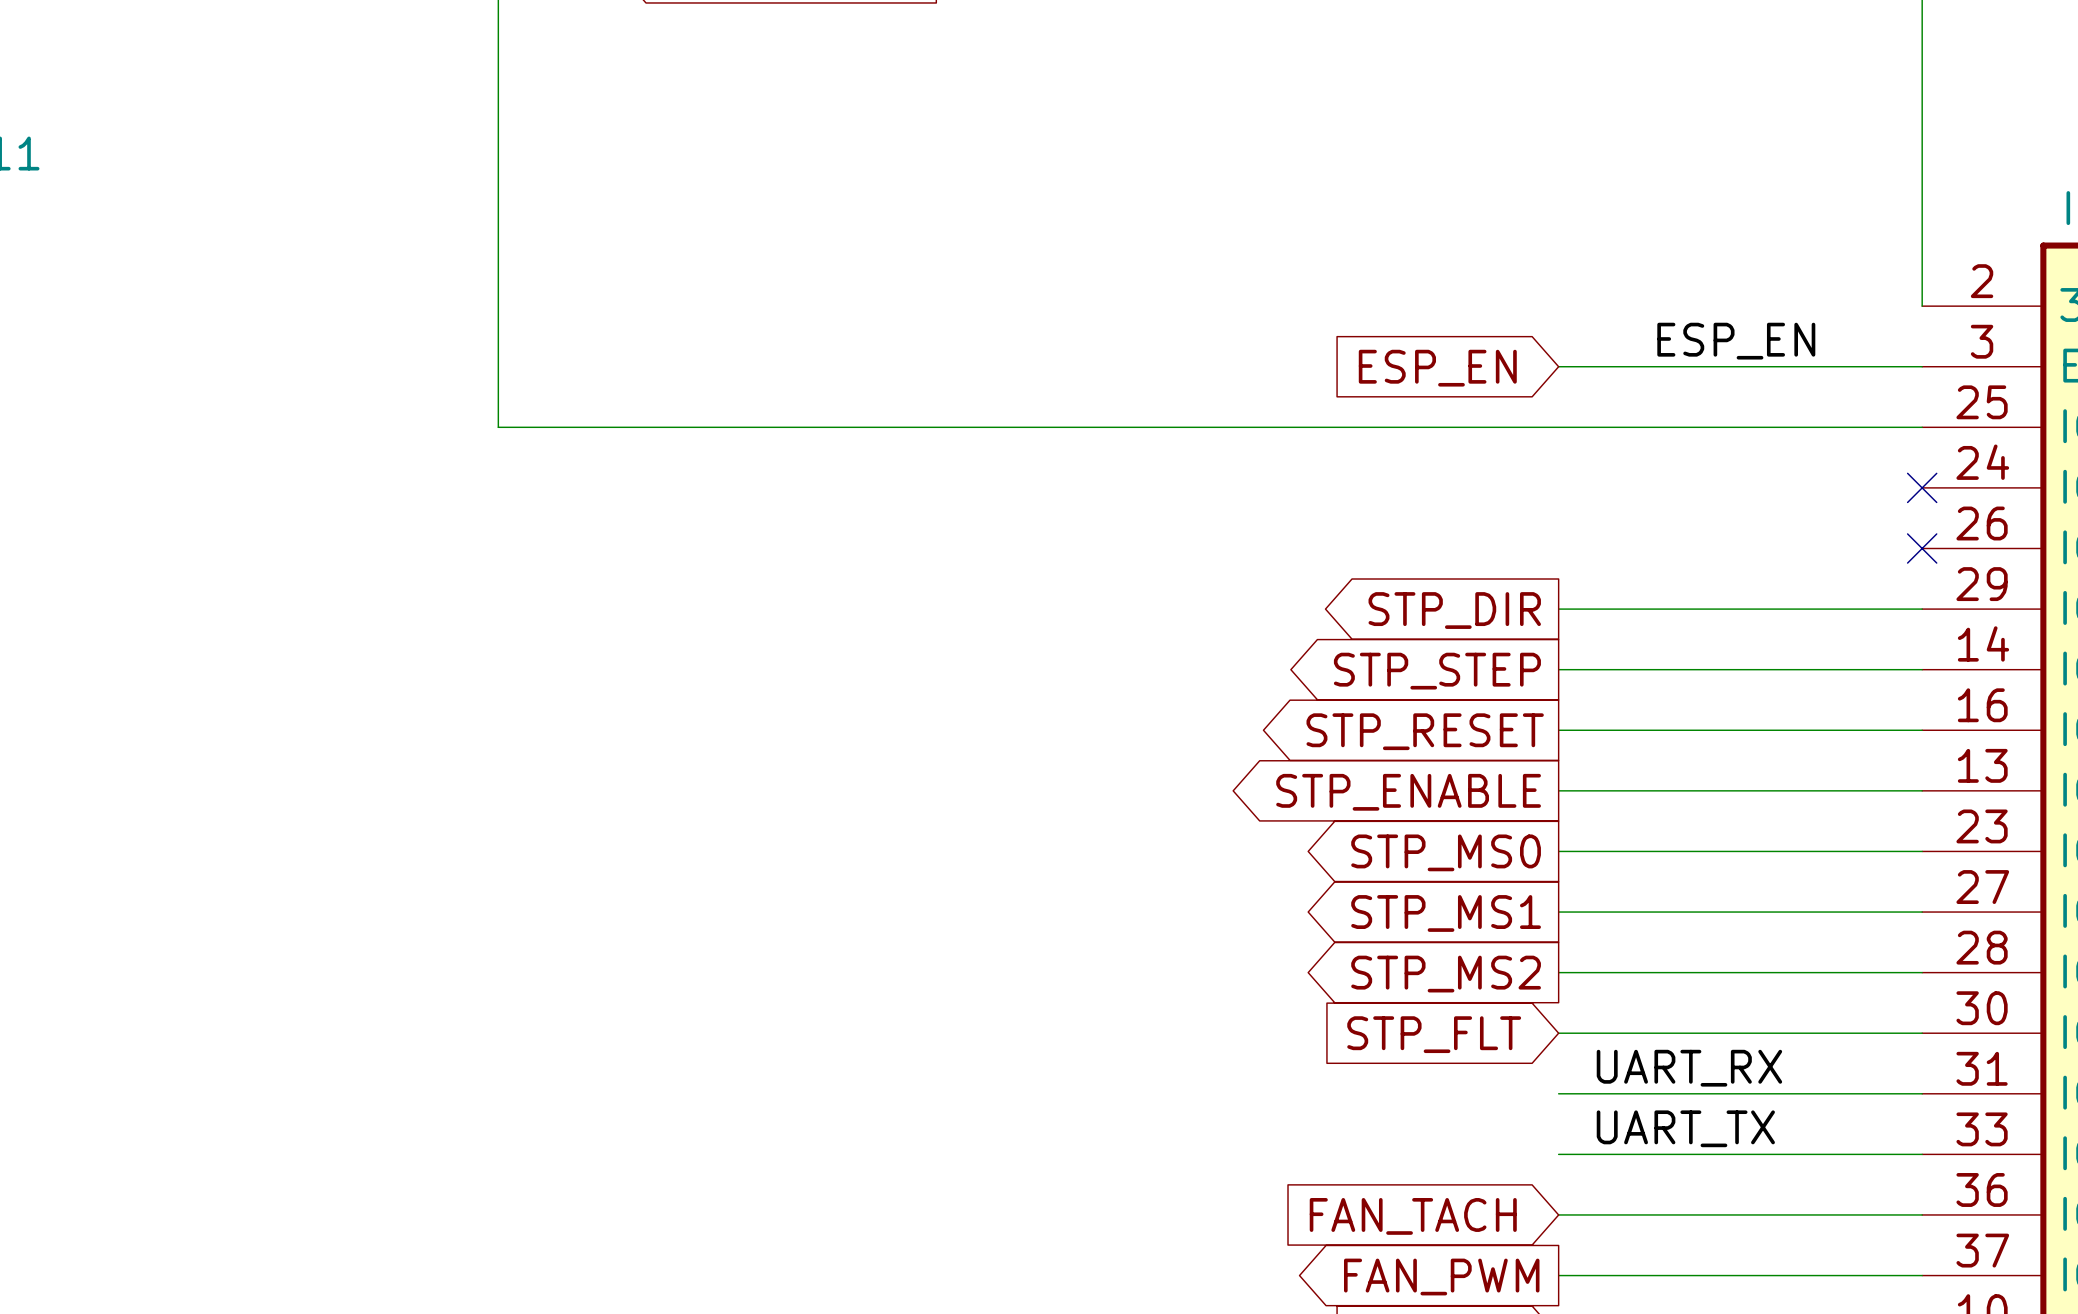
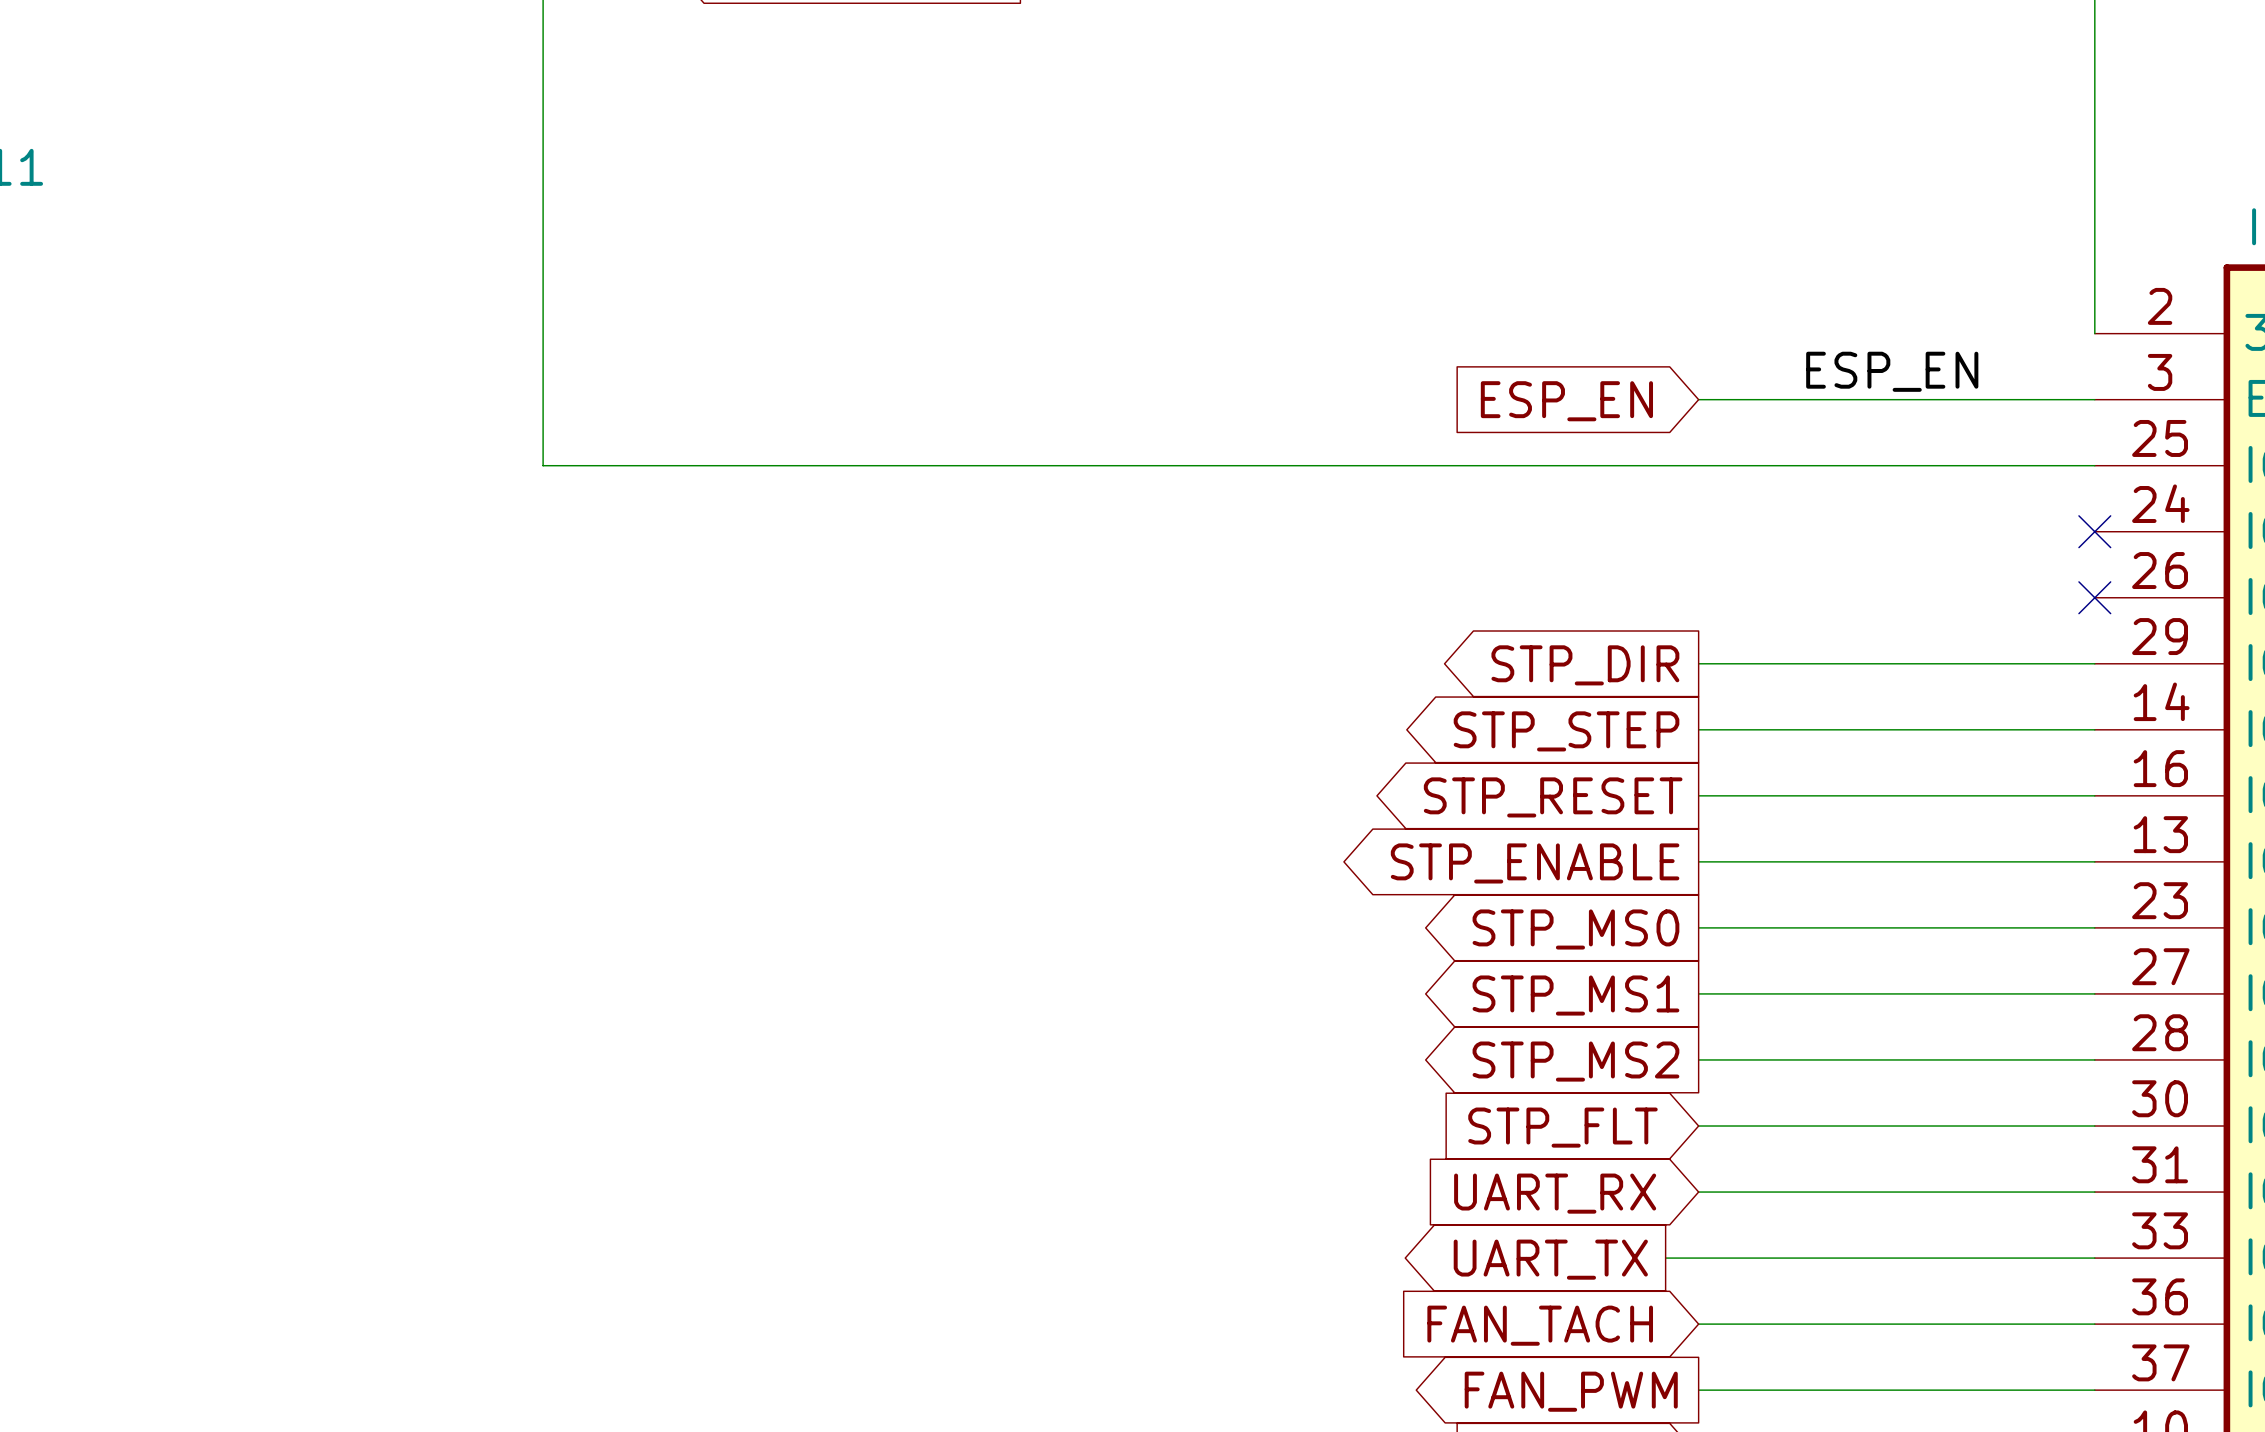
label: UART_RX (1689, 1068) -> none
global label: none -> UART_RX (1555, 1193)
label: UART_TX (1685, 1128) -> none
wire: none -> (1665, 1258) (1698, 1258)
global label: none -> UART_TX (1550, 1259)

